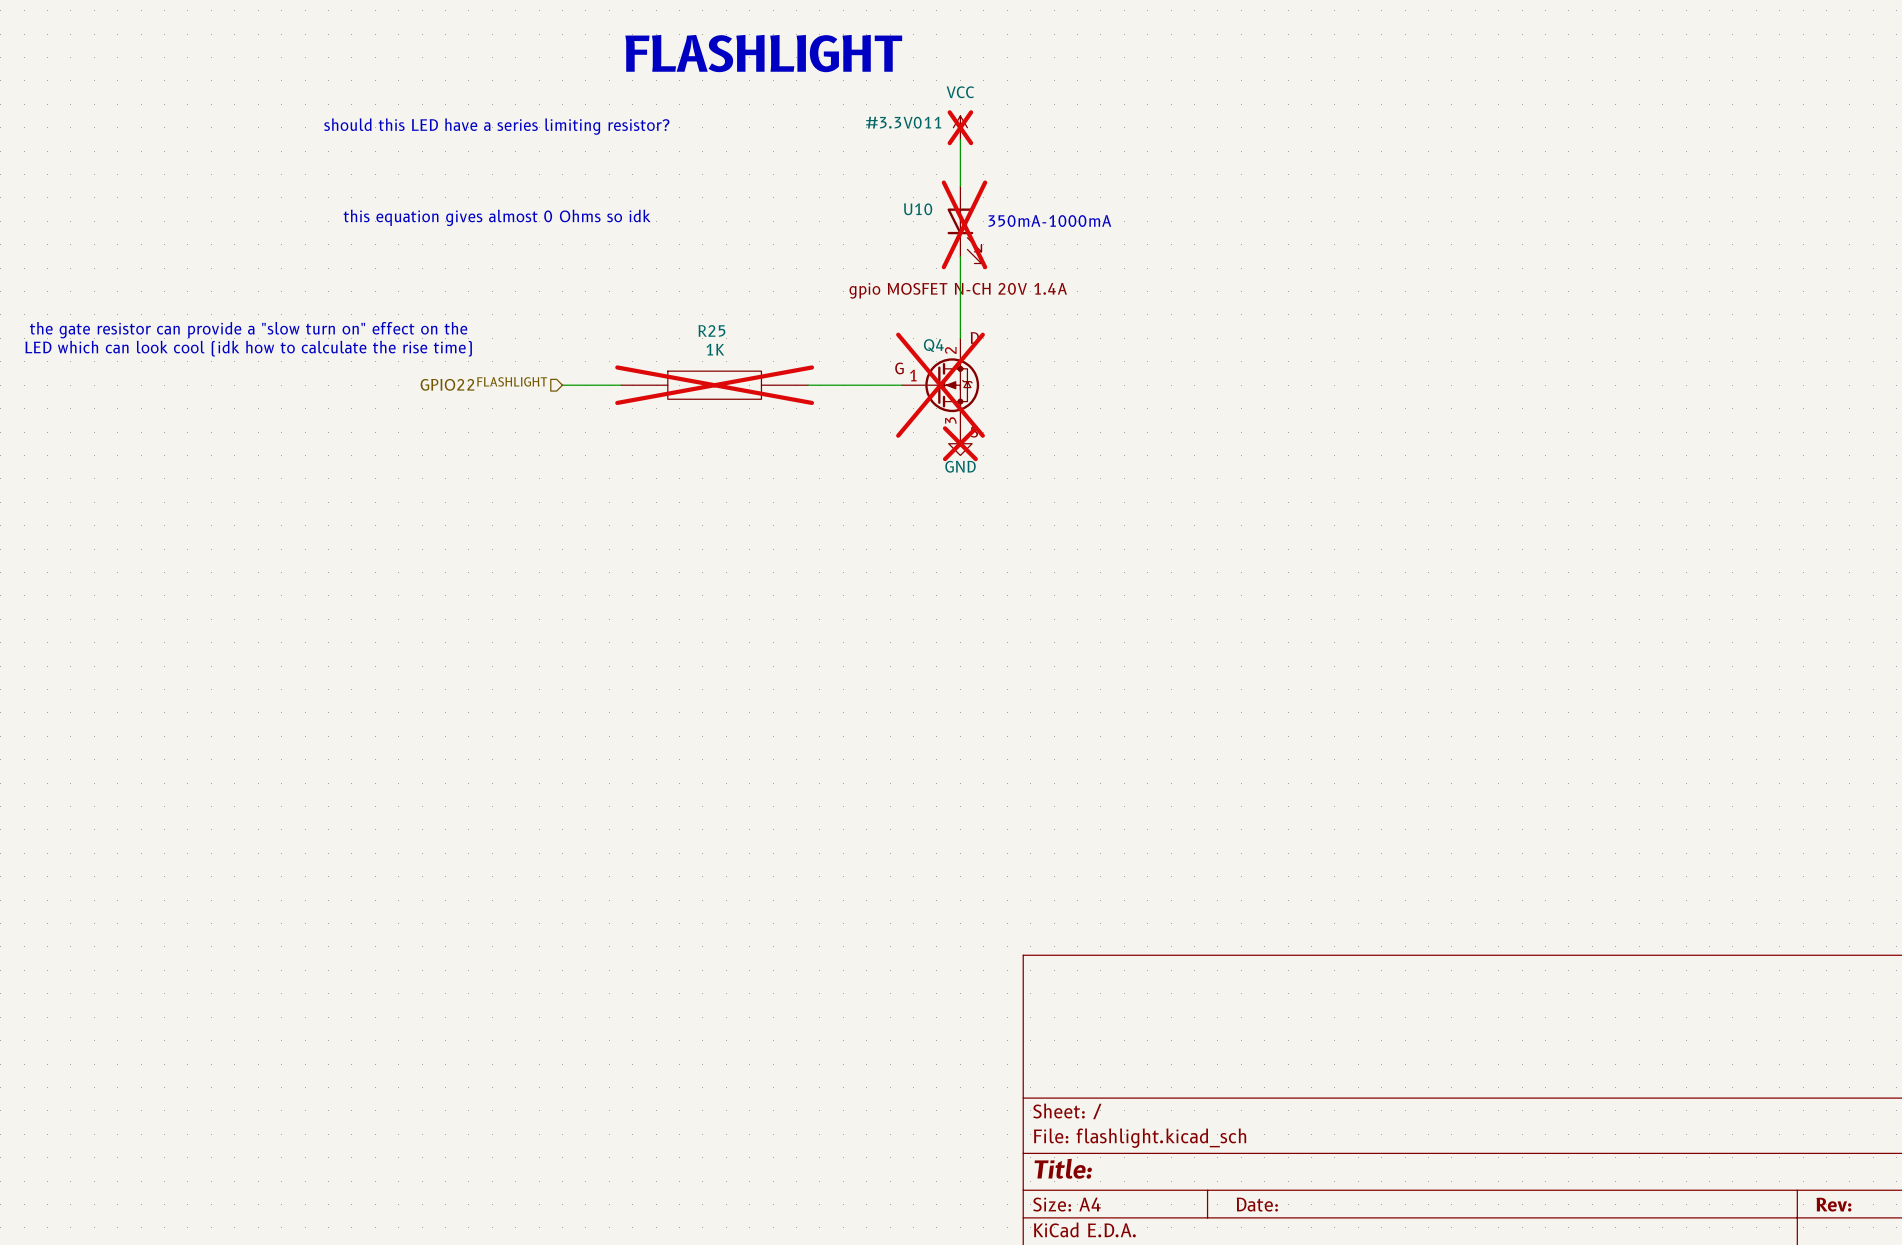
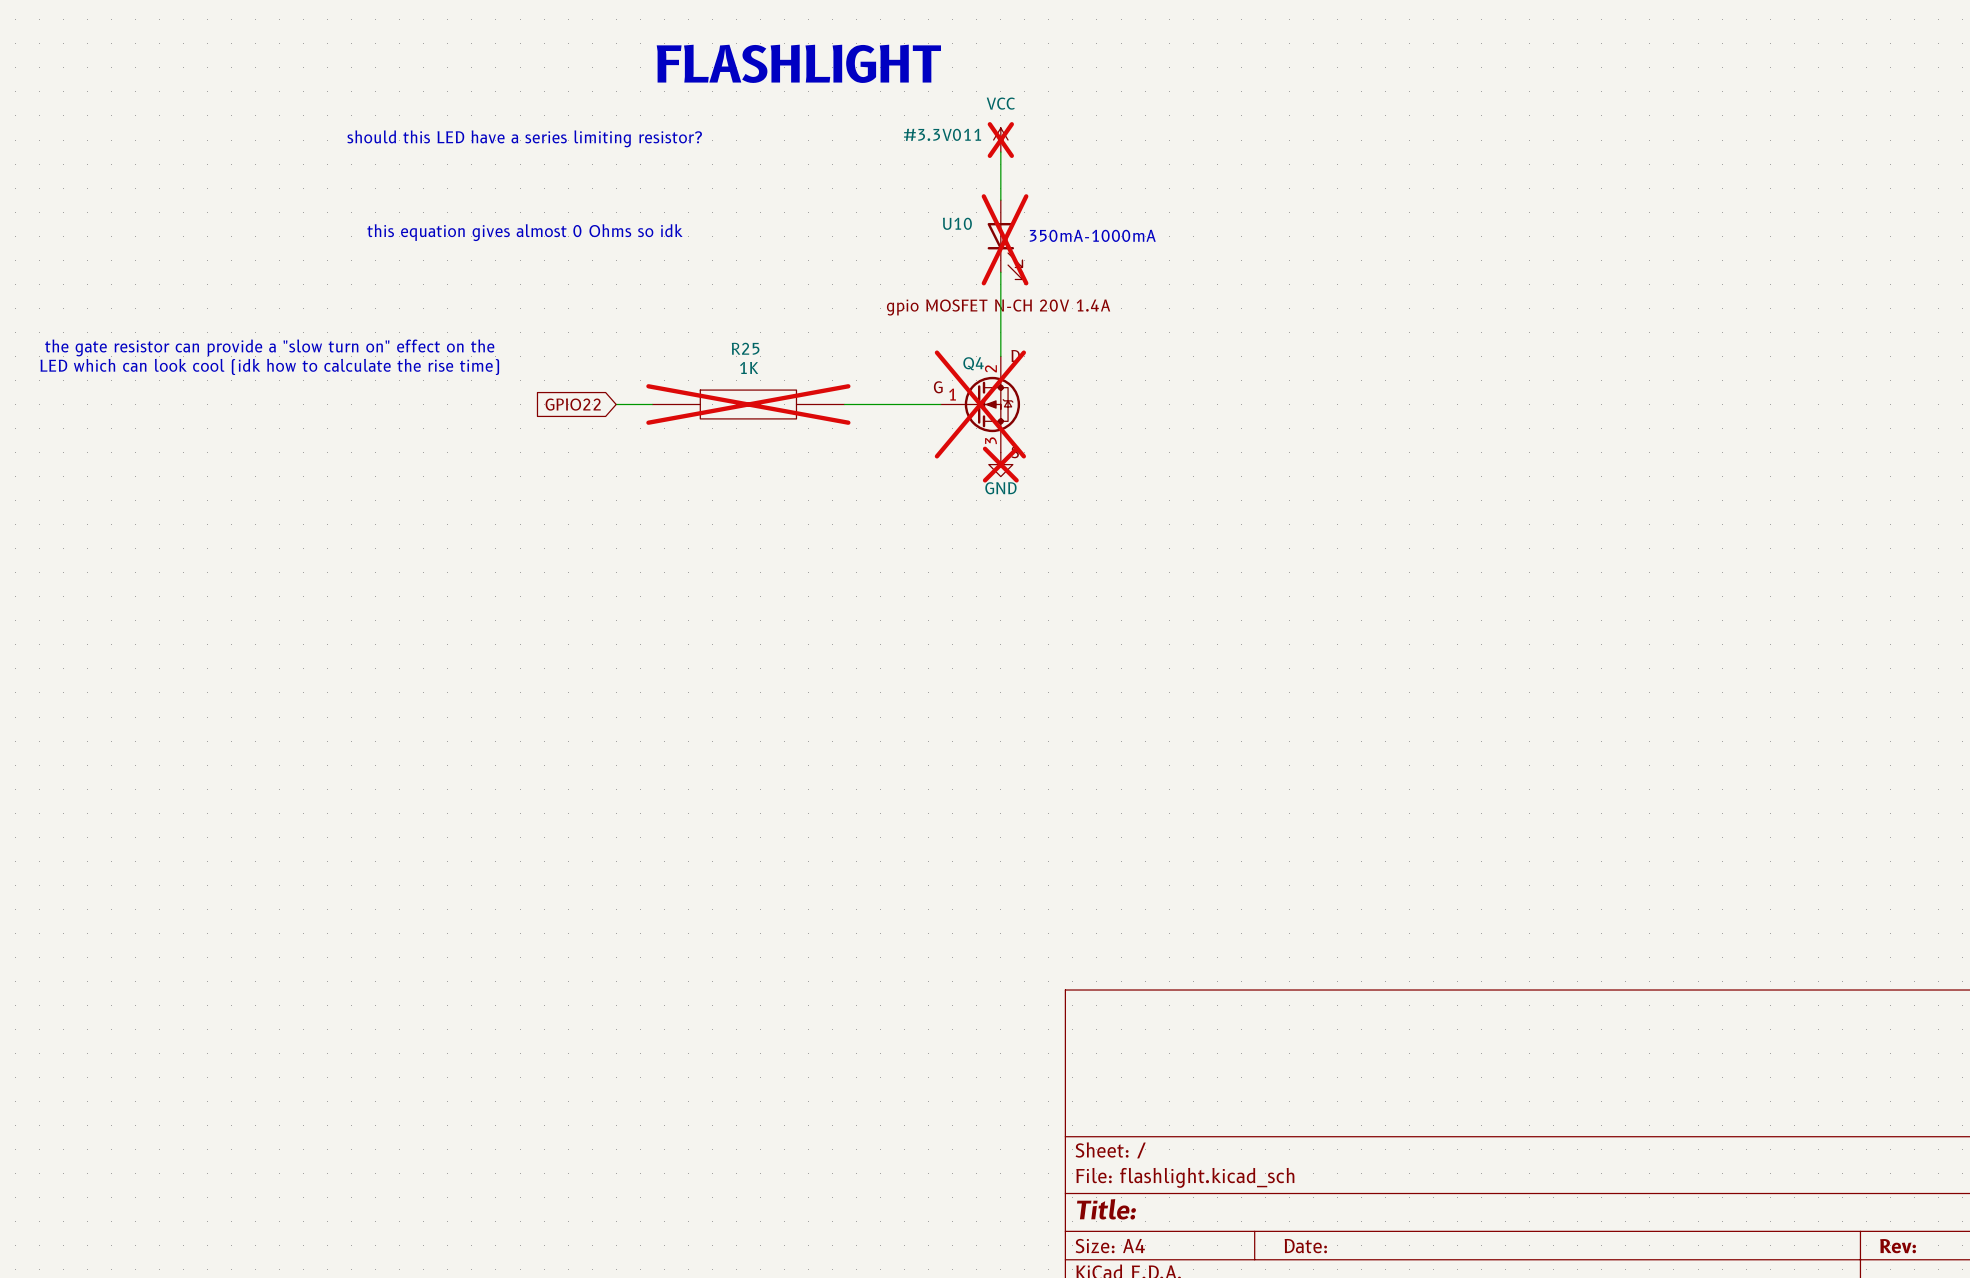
hierarchical label: GPIO22FLASHLIGHT (483, 383) -> none
global label: none -> GPIO22 (573, 404)
wire: (562, 385) (585, 385) -> none

